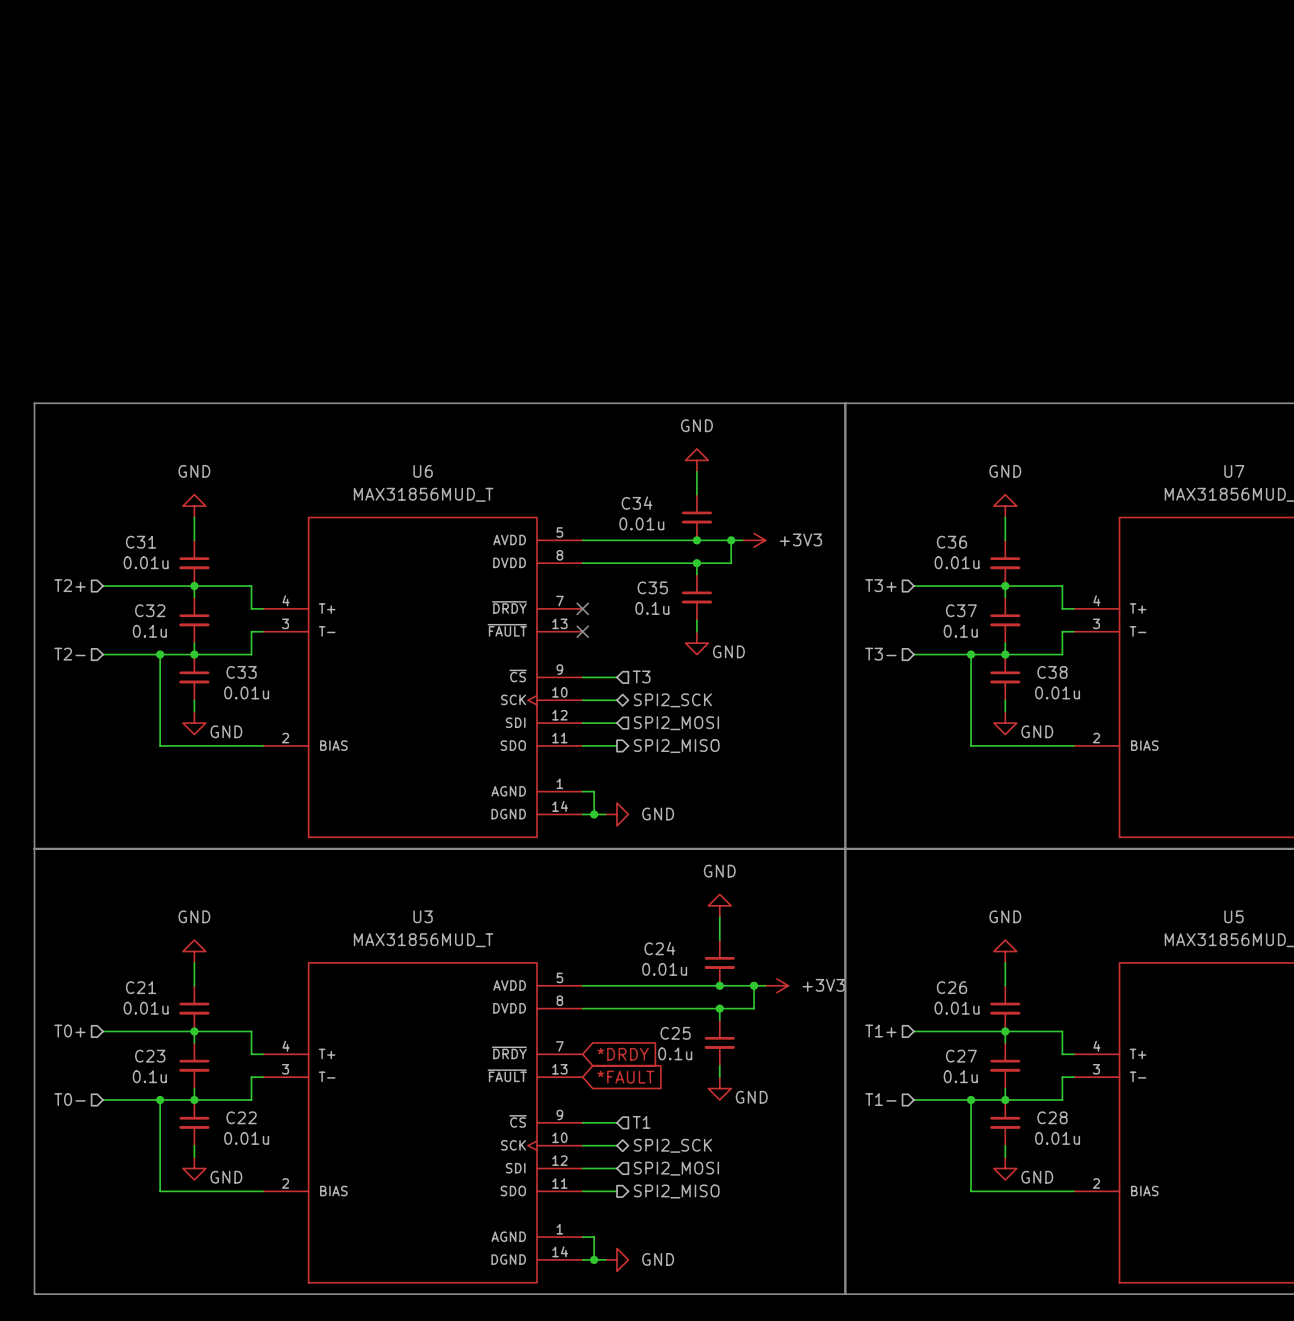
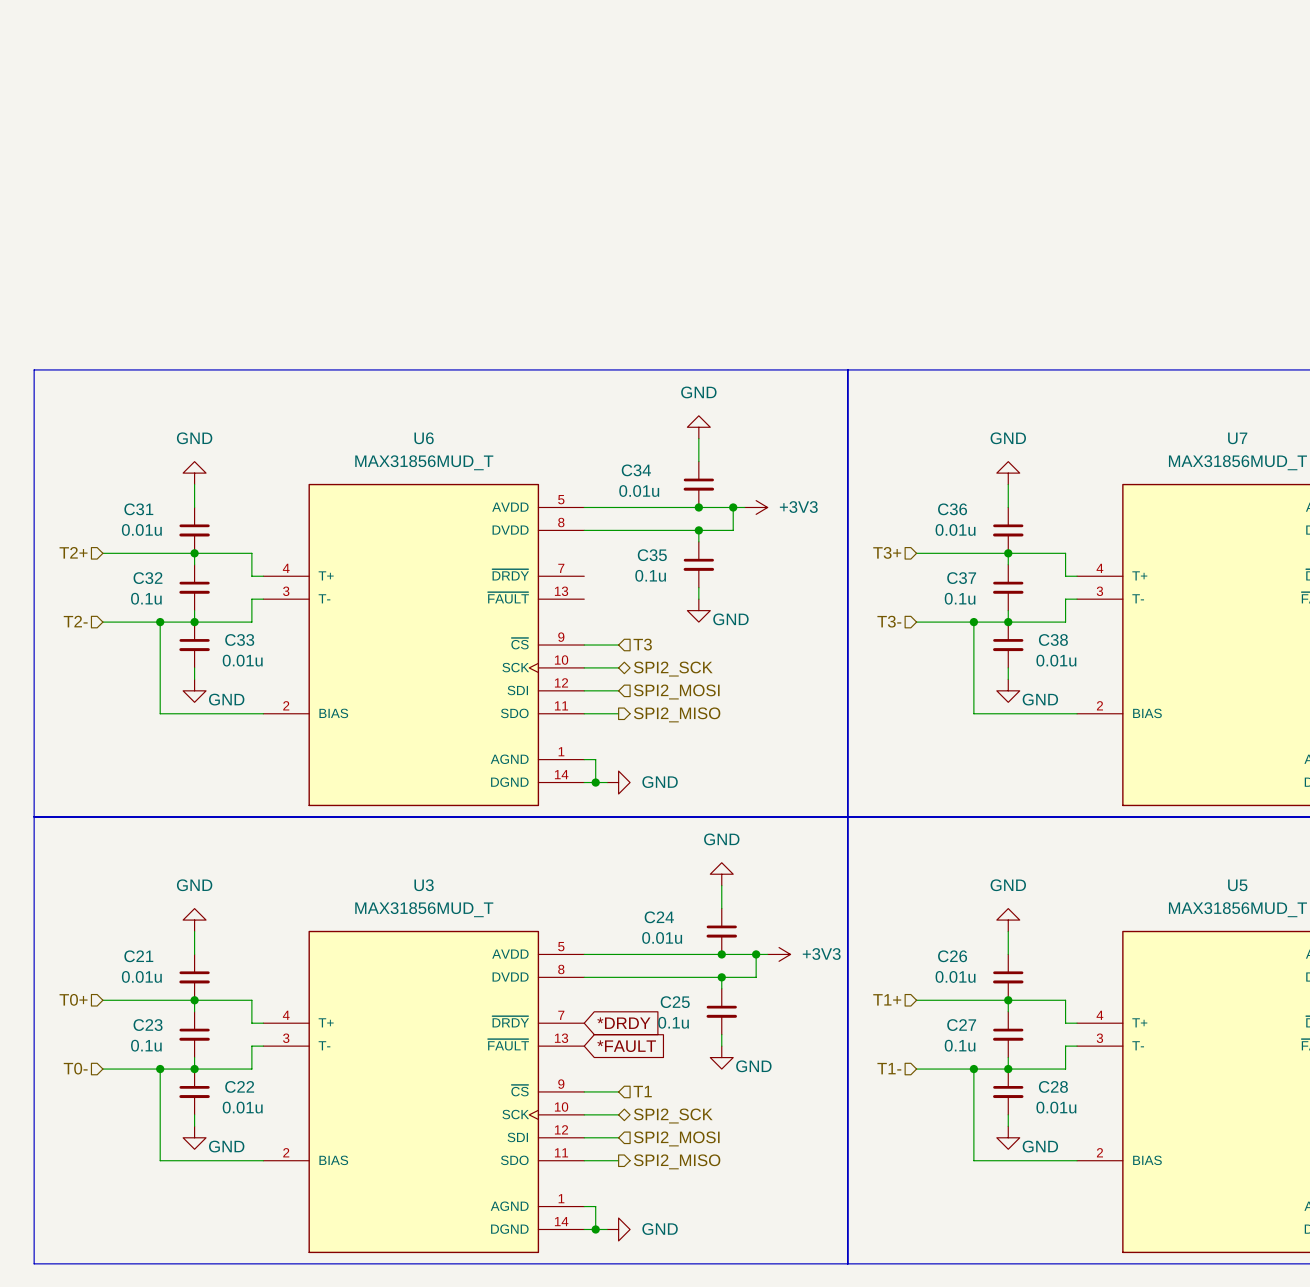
no-connect mark: (582, 608) -> none
no-connect mark: (582, 631) -> none

